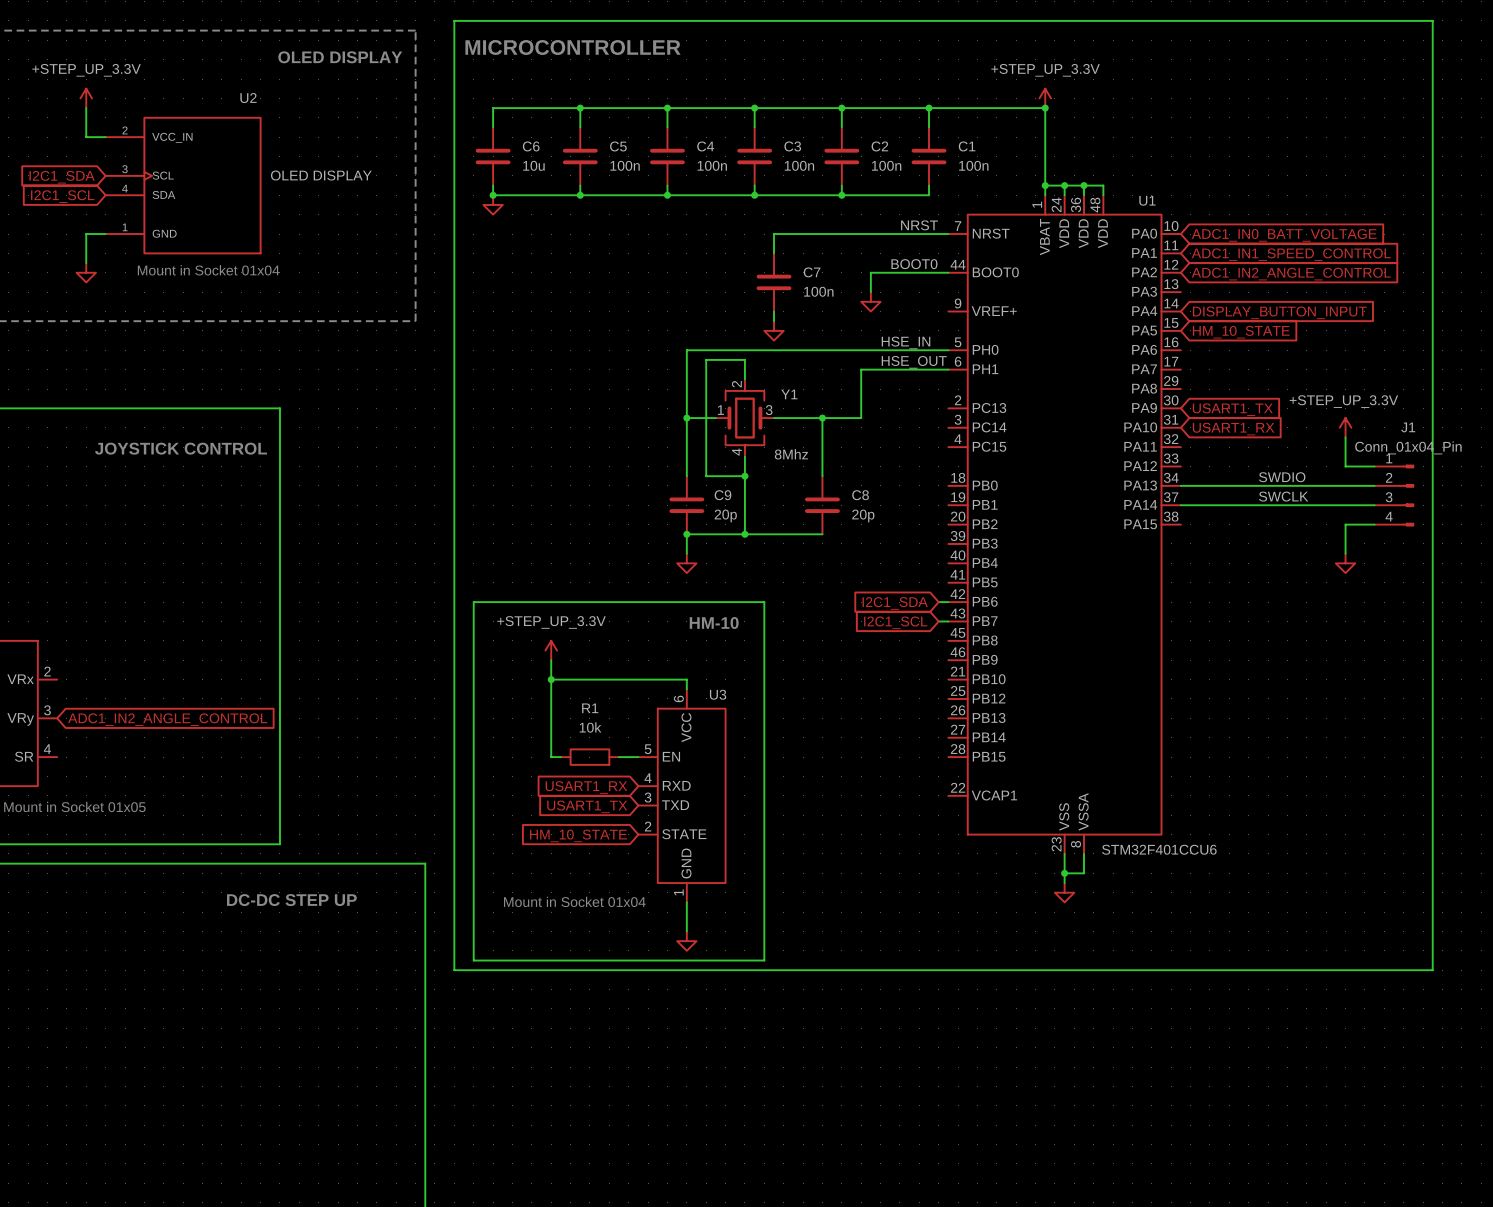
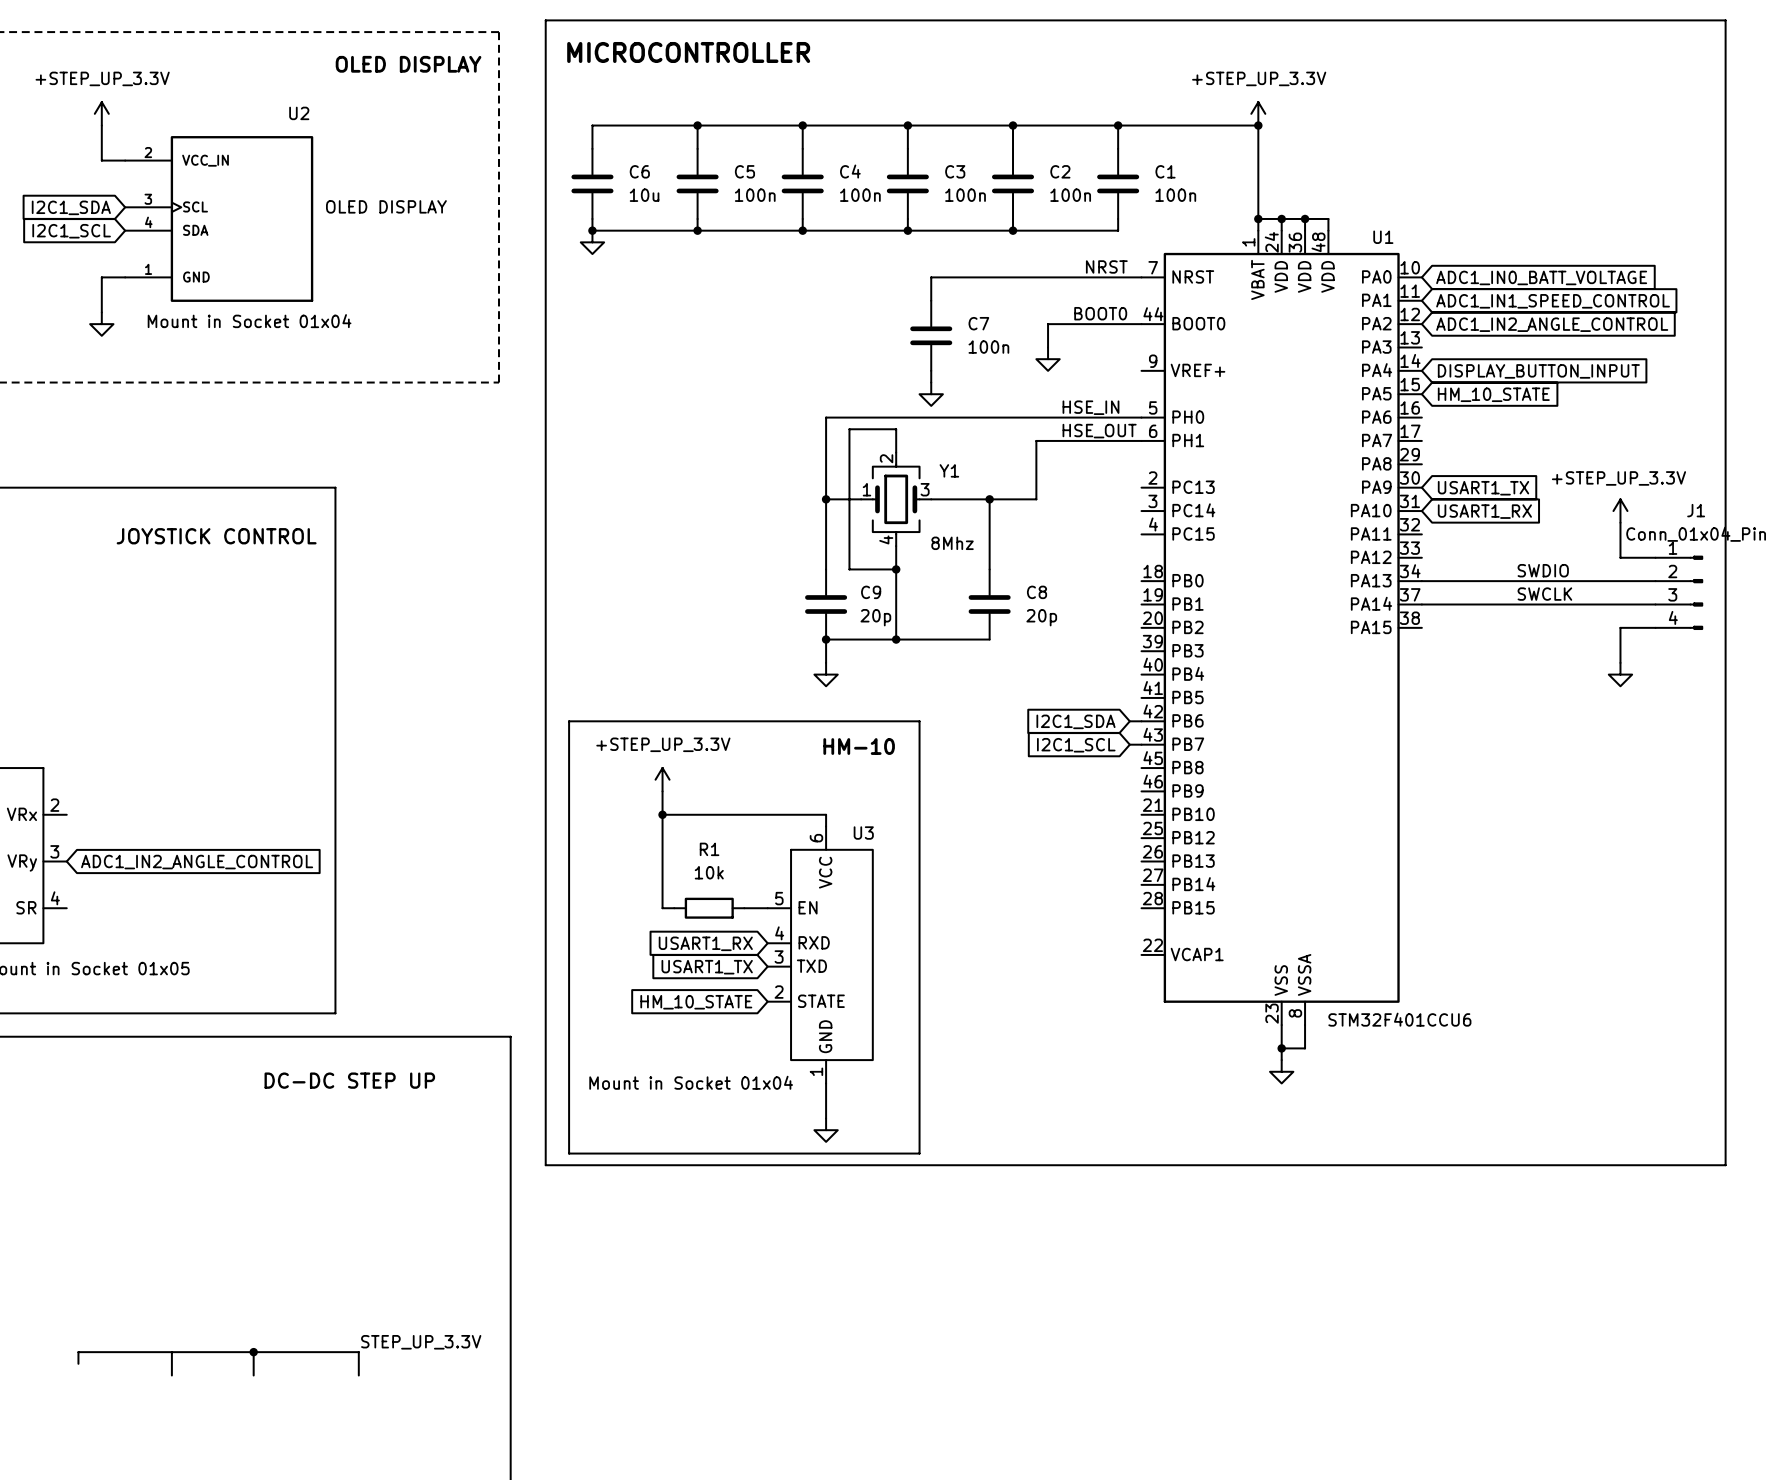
label: none -> STEP_UP_3.3V (421, 1342)
wire: none -> (171, 1352) (171, 1375)
wire: none -> (253, 1352) (253, 1375)
junction: none -> (253, 1352)
wire: none -> (78, 1363) (78, 1352) (358, 1352) (358, 1375)

